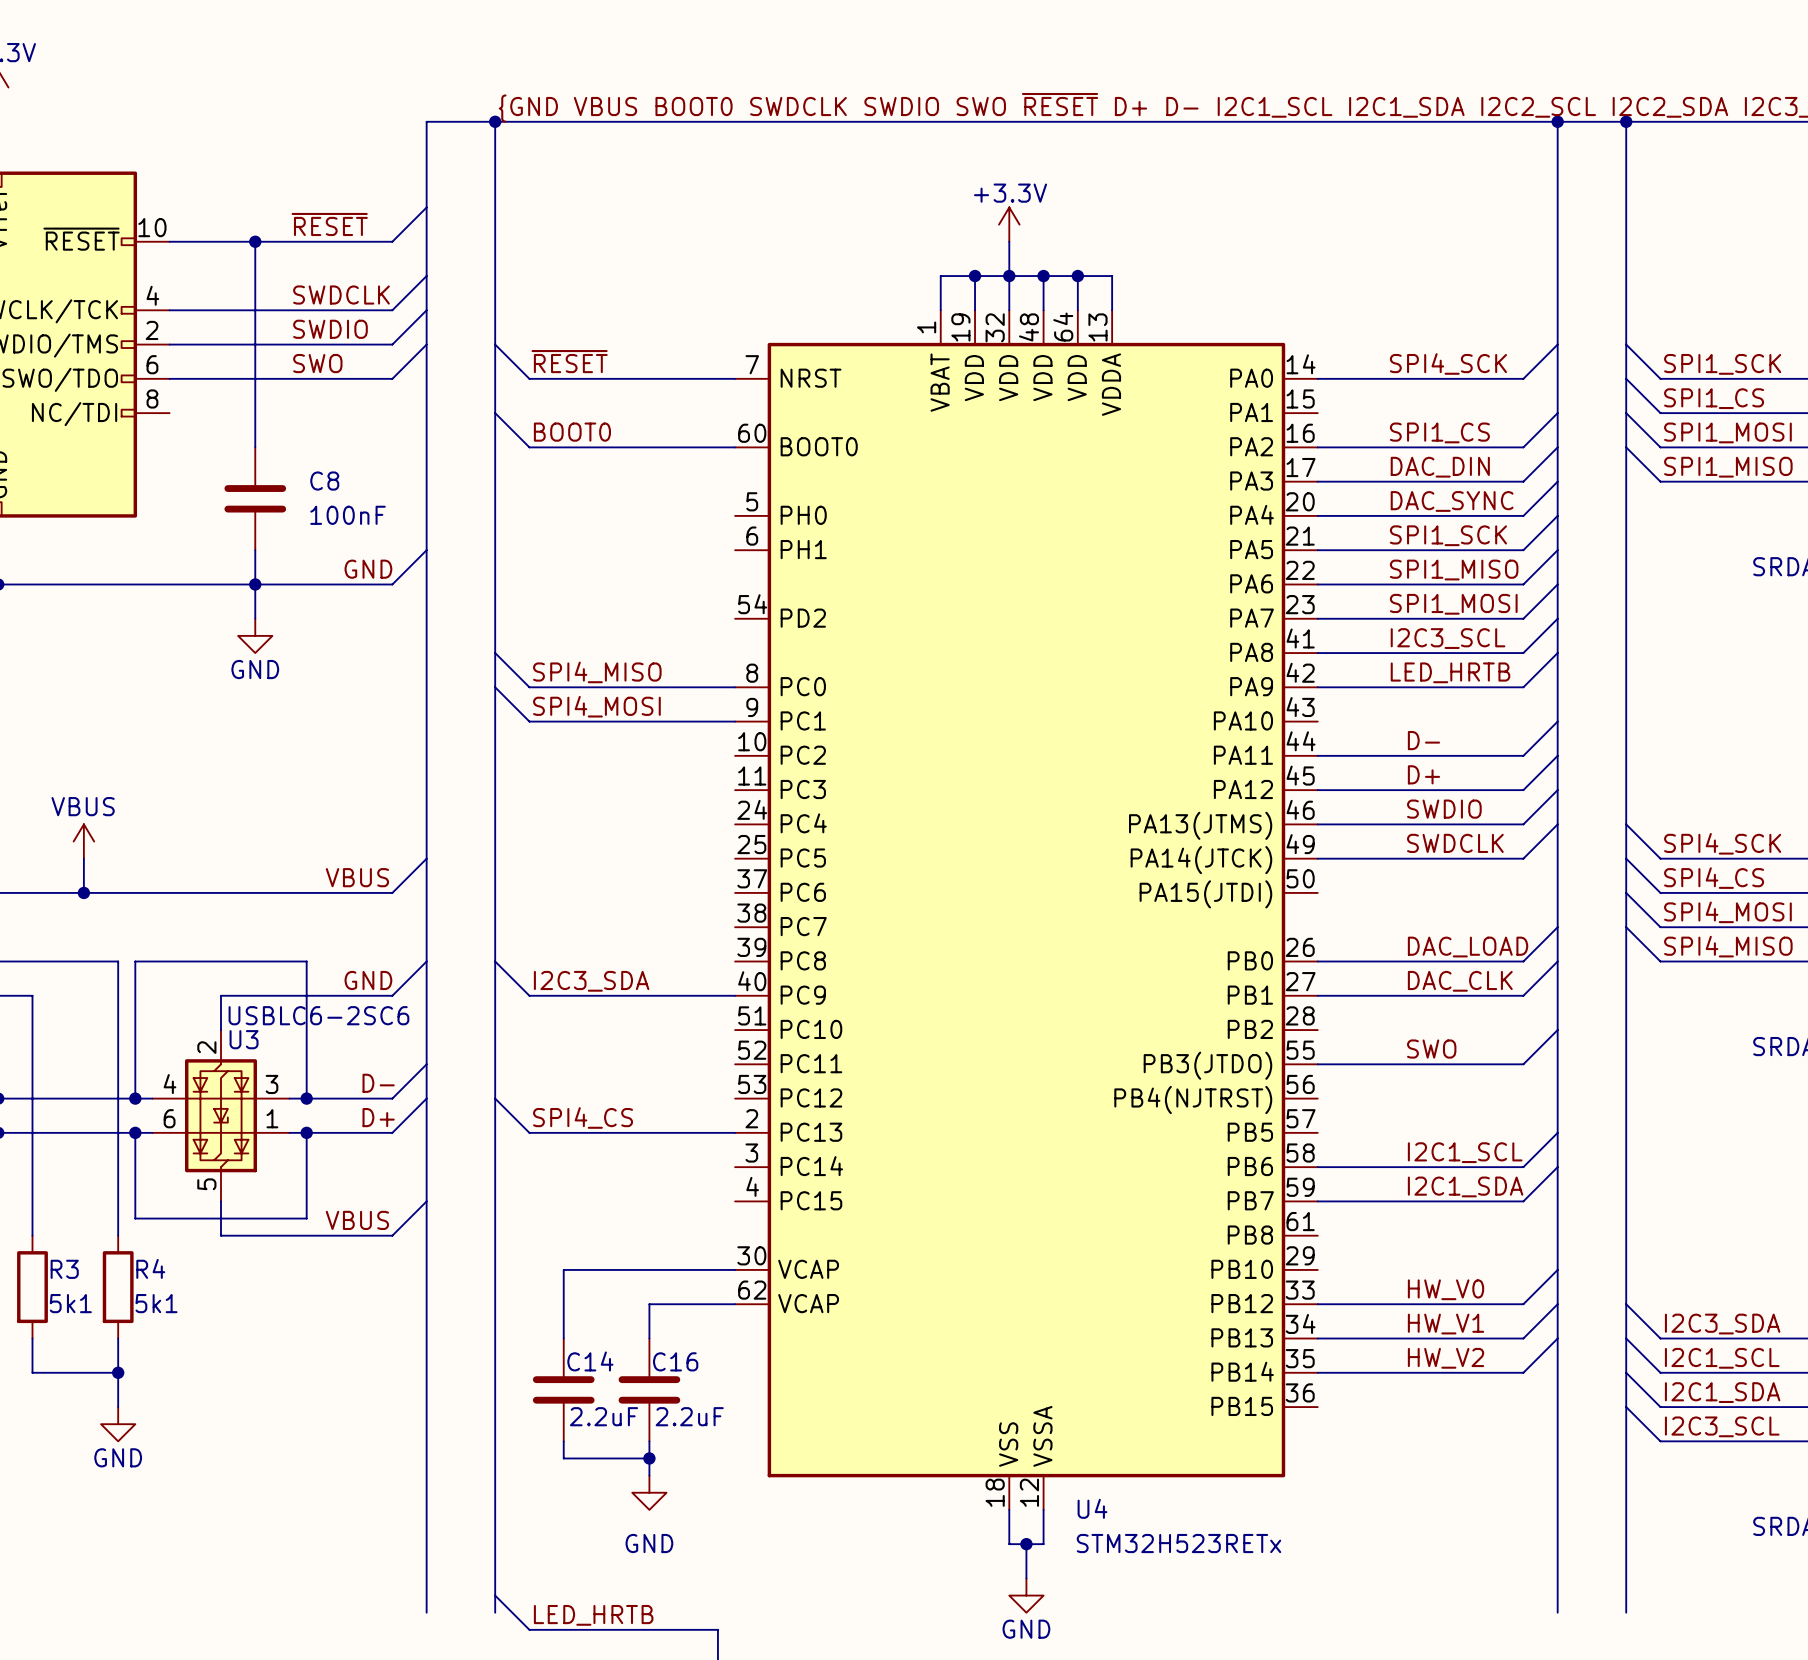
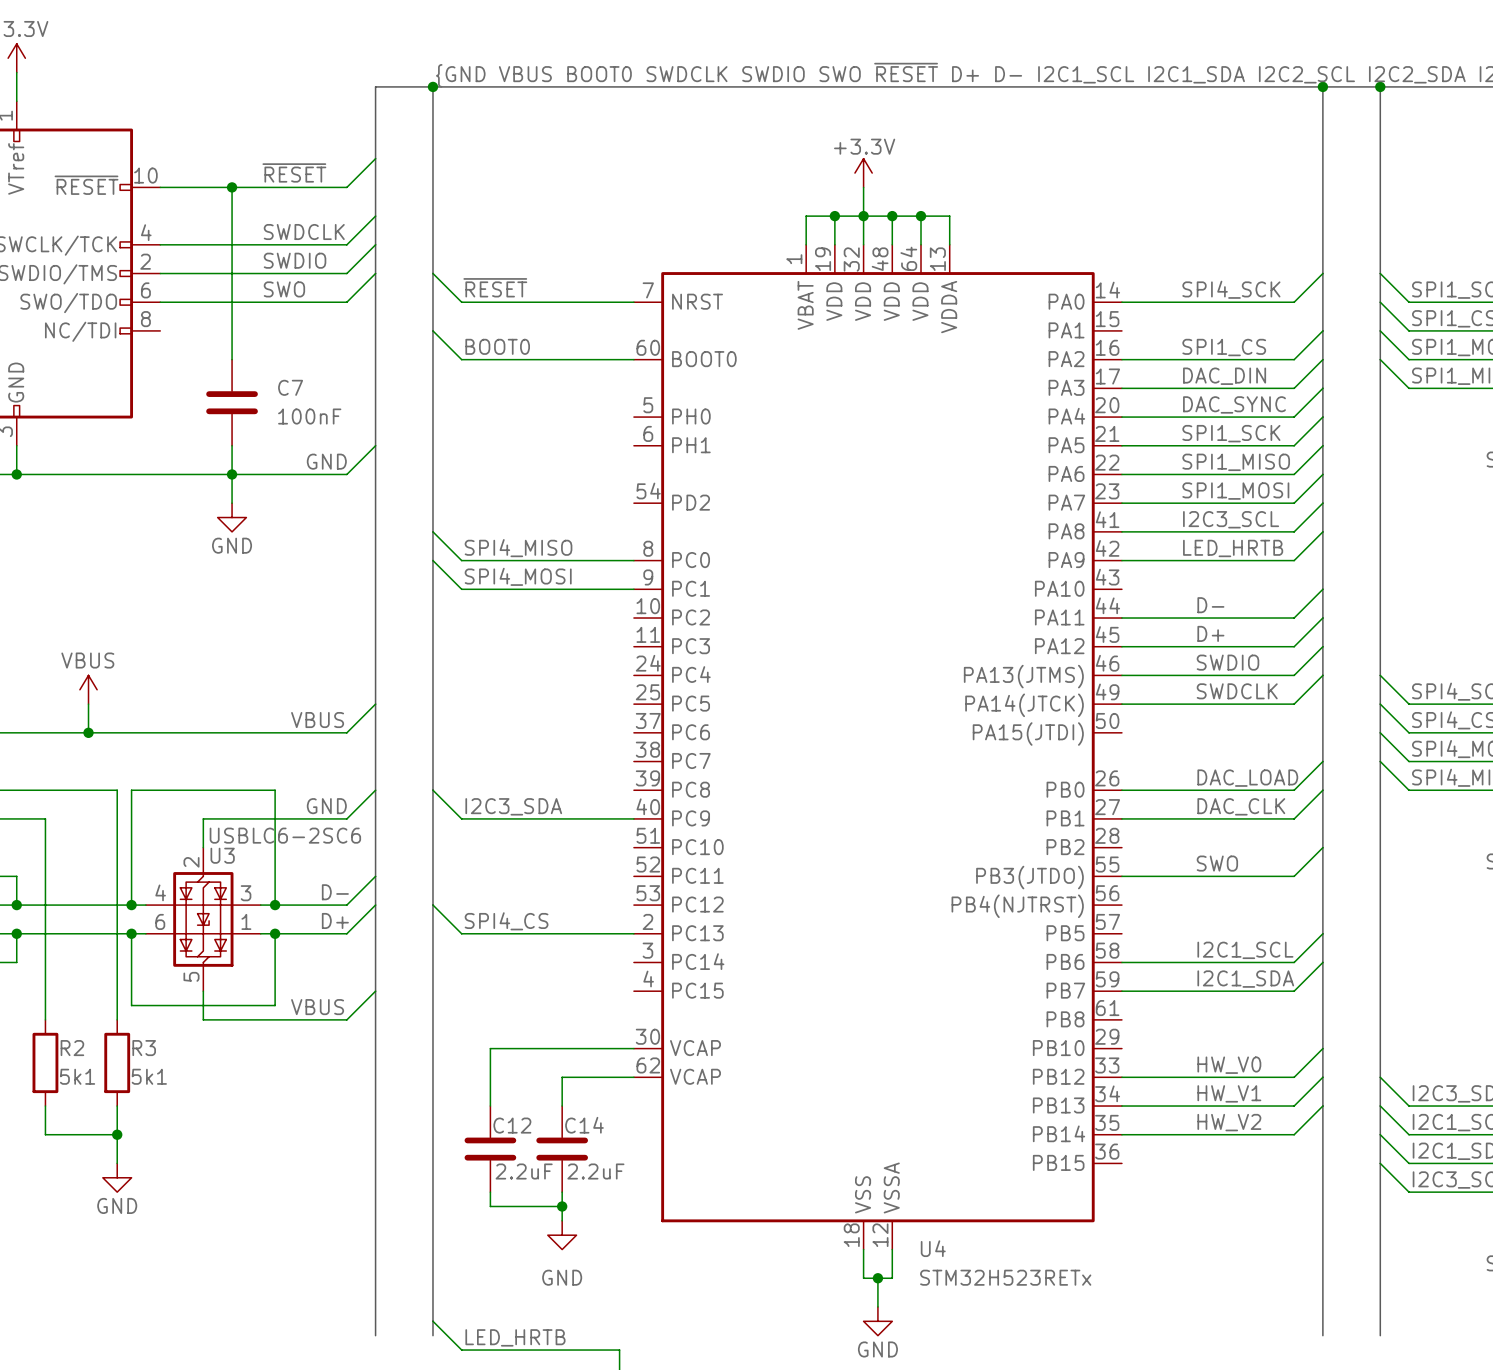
C8 name: C8 (324, 481) -> C7 (290, 387)
R4 name: R4 (150, 1268) -> R3 (144, 1048)
R3 name: R3 (64, 1269) -> R2 (72, 1048)
C14 name: C14 (590, 1361) -> C12 (512, 1125)
C16 name: C16 (675, 1361) -> C14 (584, 1125)

